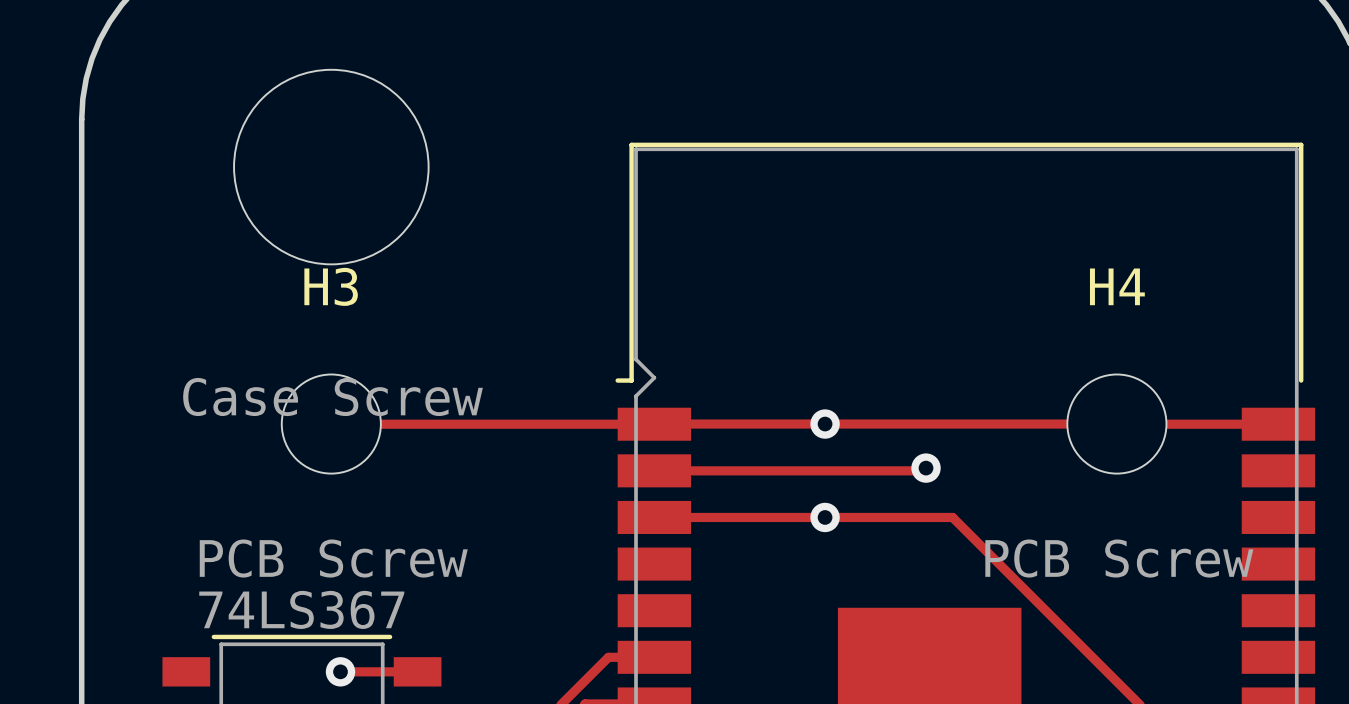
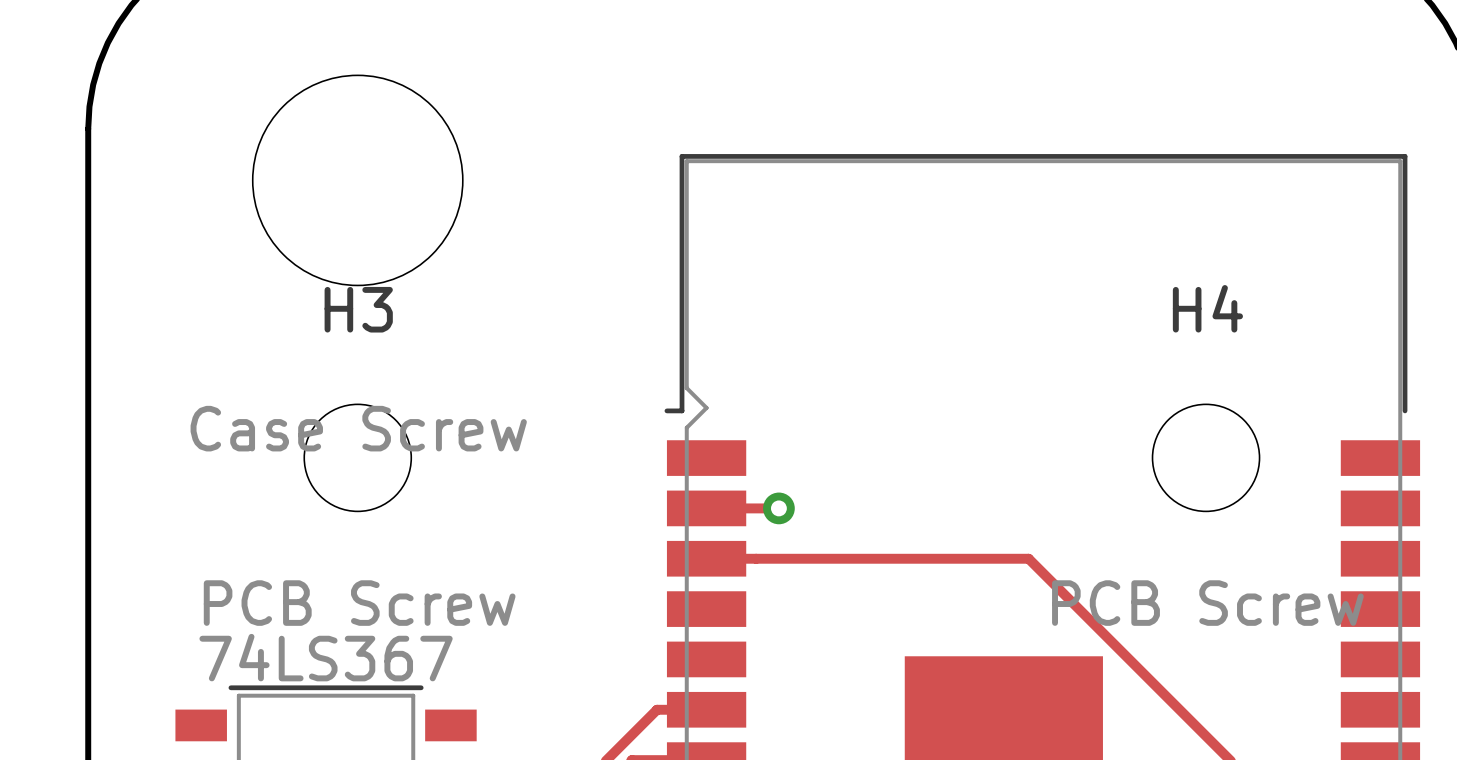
track: (331, 424) (1278, 424) -> none
via: (825, 424) -> none
track: (926, 468) (923, 470) (721, 470) -> none
via: (926, 468) -> none
via: none -> (778, 508)
via: (825, 517) -> none
track: (340, 671) (417, 671) -> none
via: (340, 671) -> none

